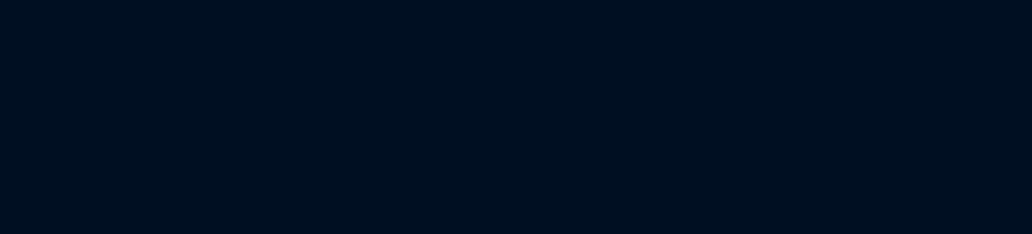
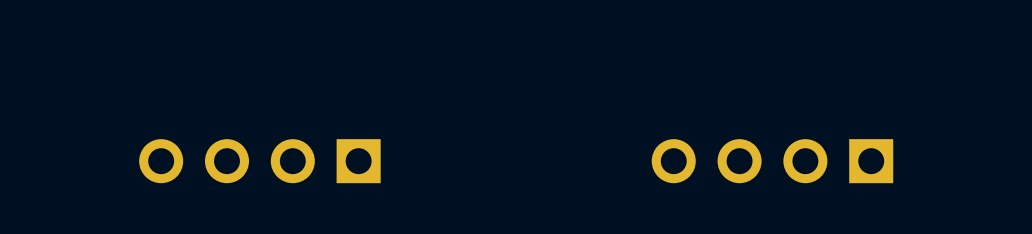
part: none -> (259, 161)
part: none -> (772, 161)

